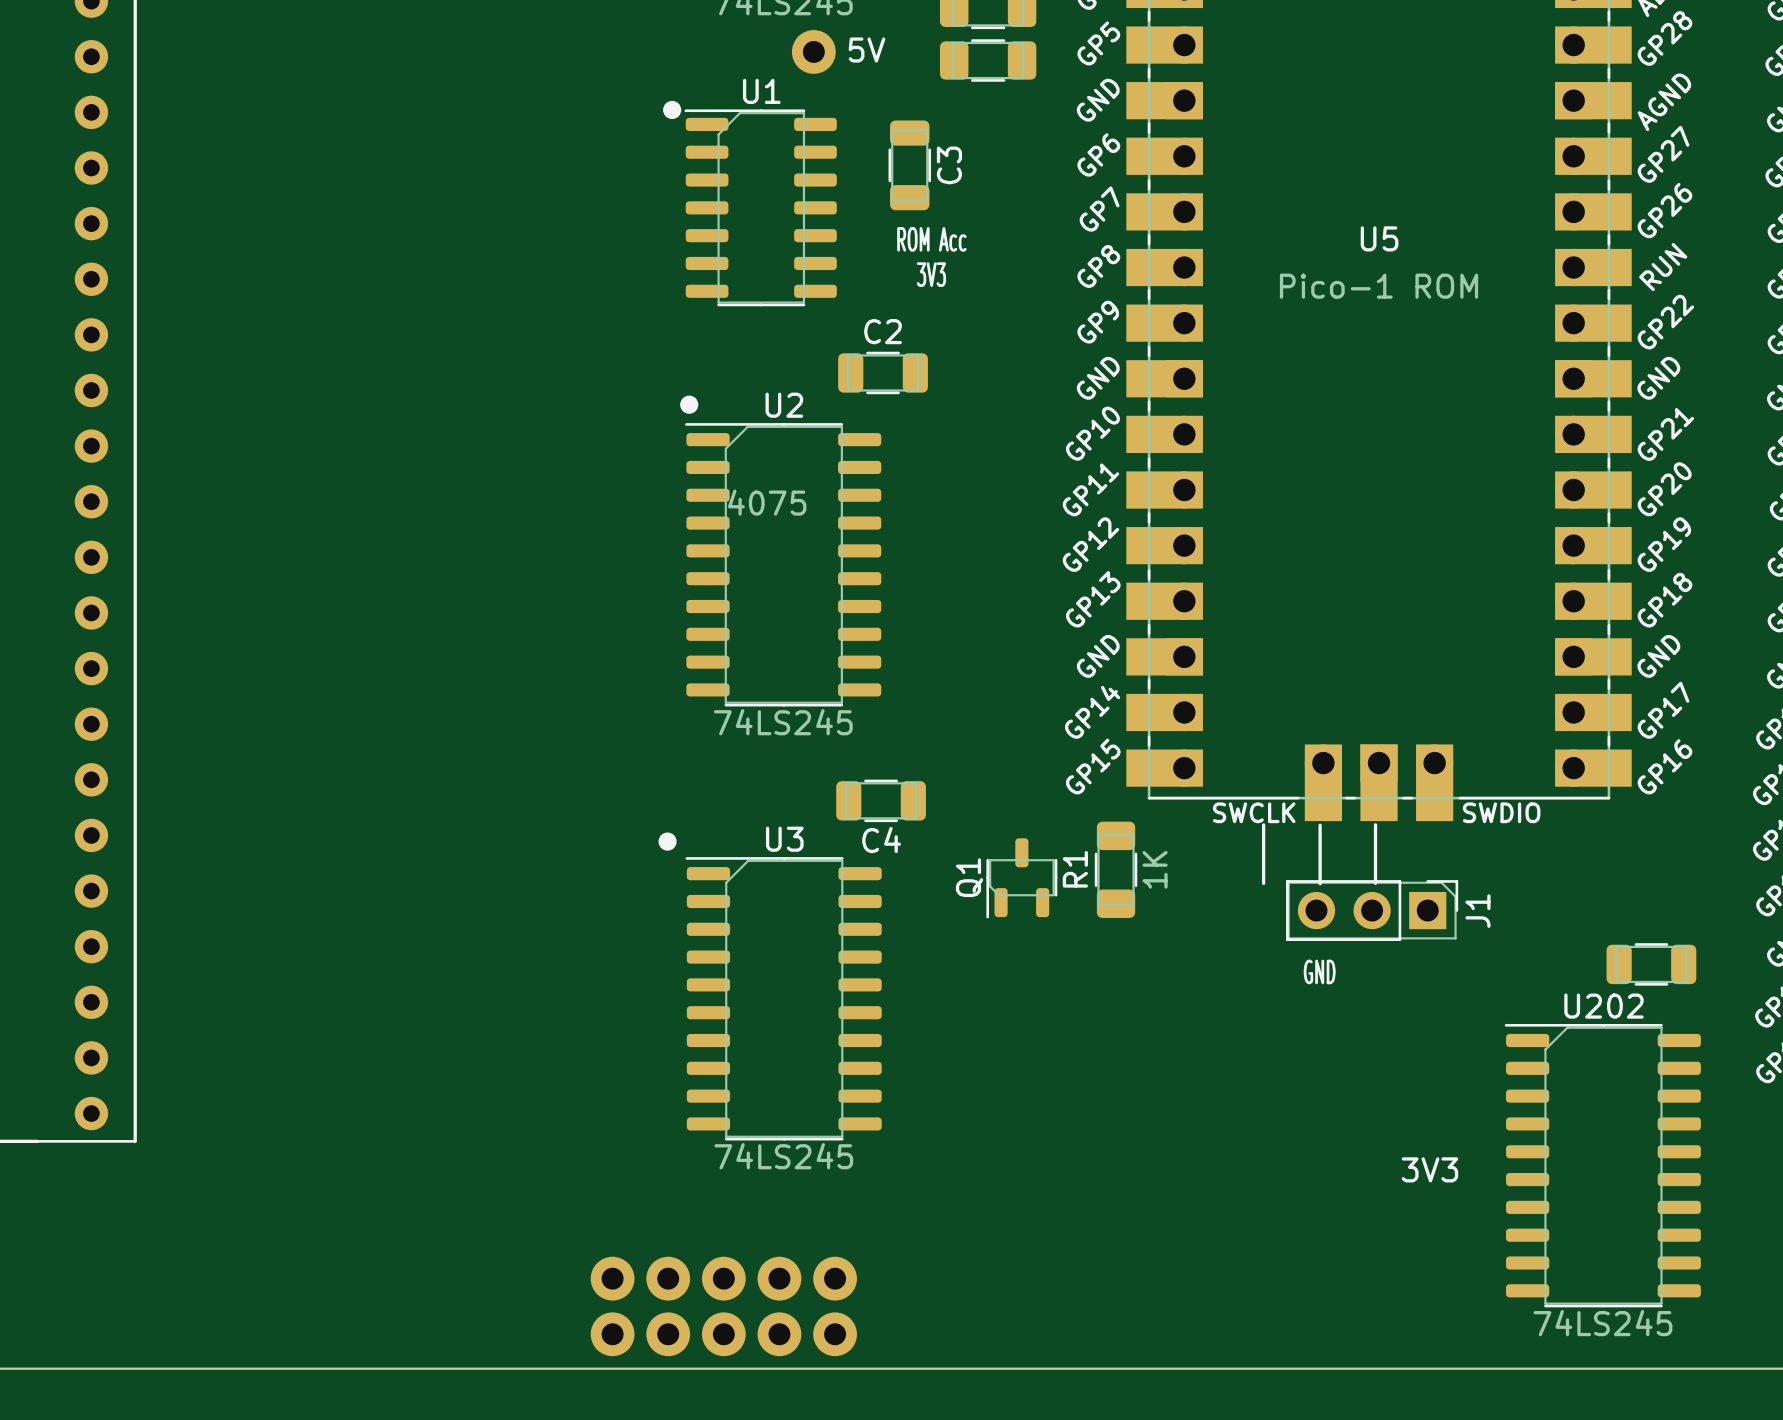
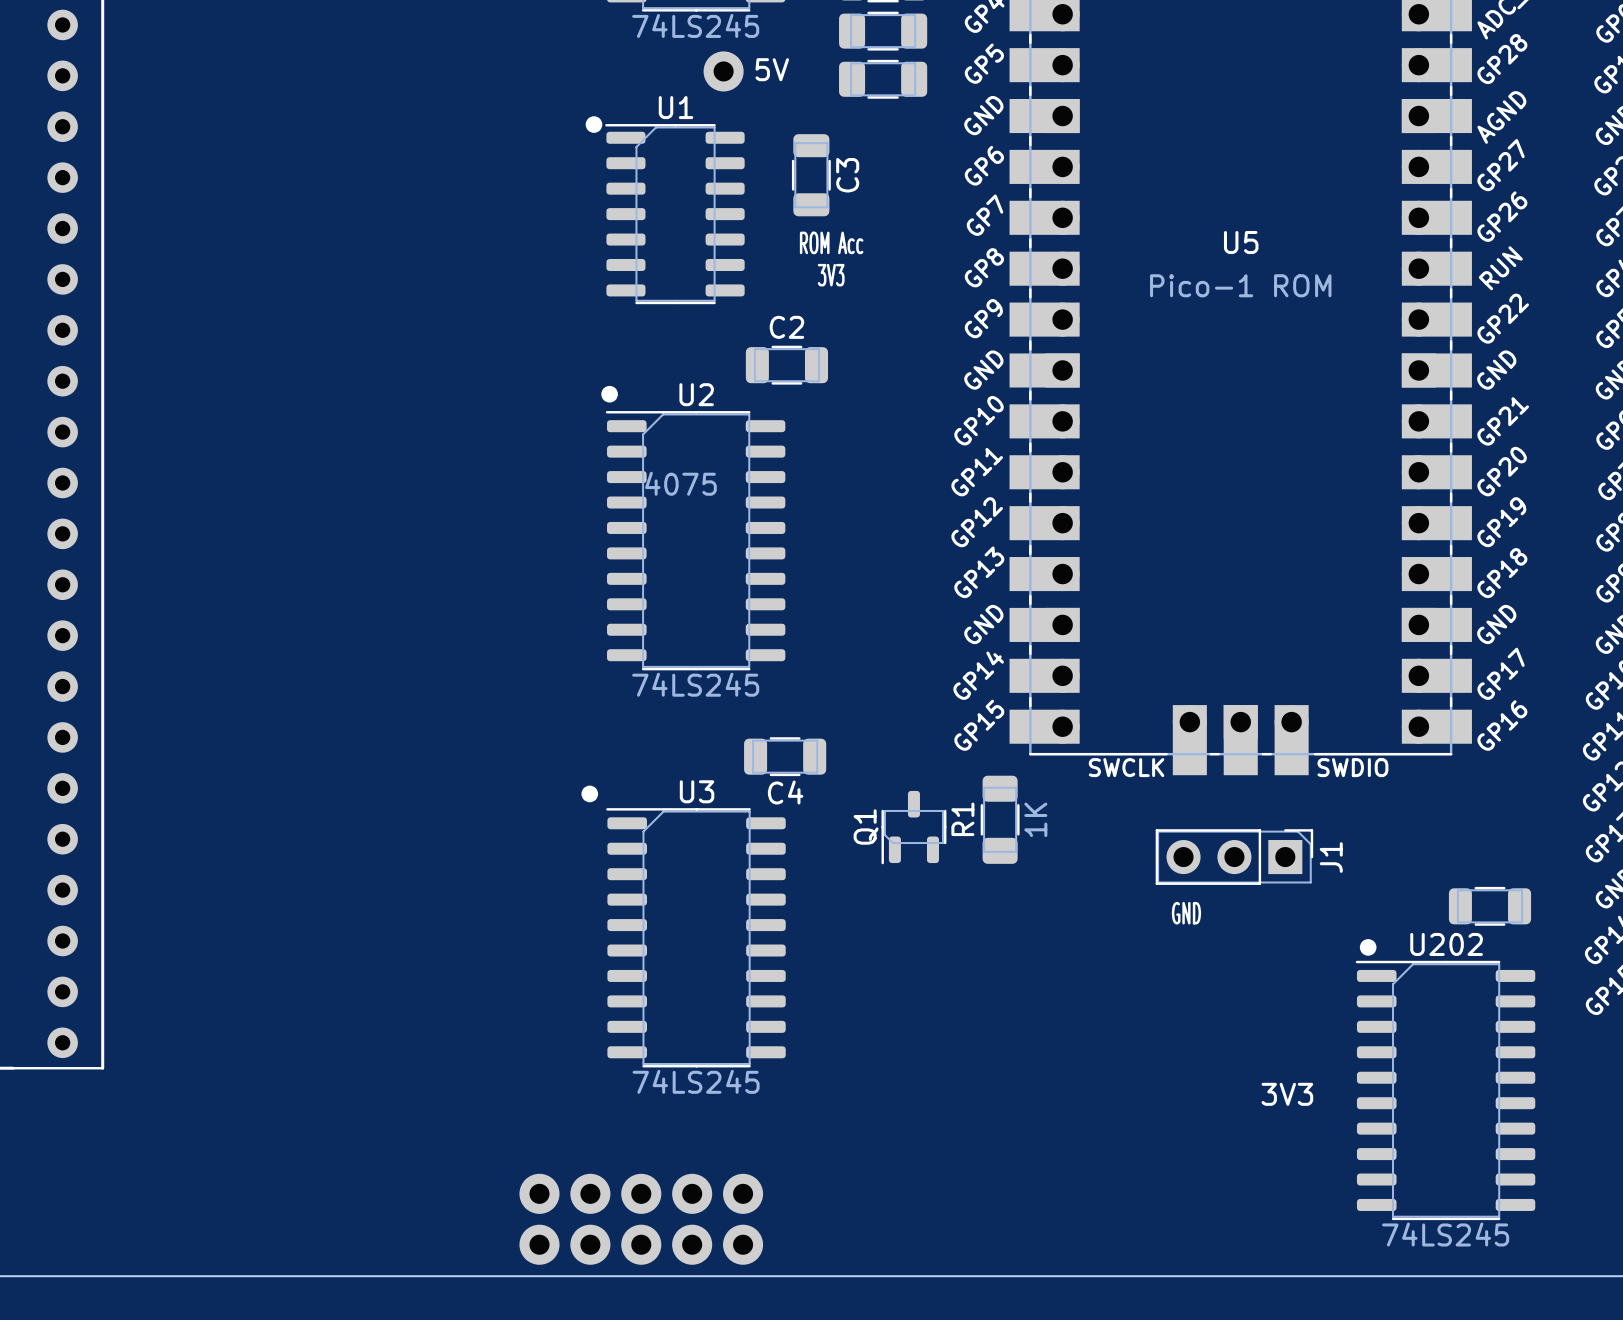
line: (1263, 824) (1263, 883) -> none
line: (1375, 824) (1375, 883) -> none
line: (1320, 825) (1320, 883) -> none
drawing: none -> [1359, 939, 1377, 956]

